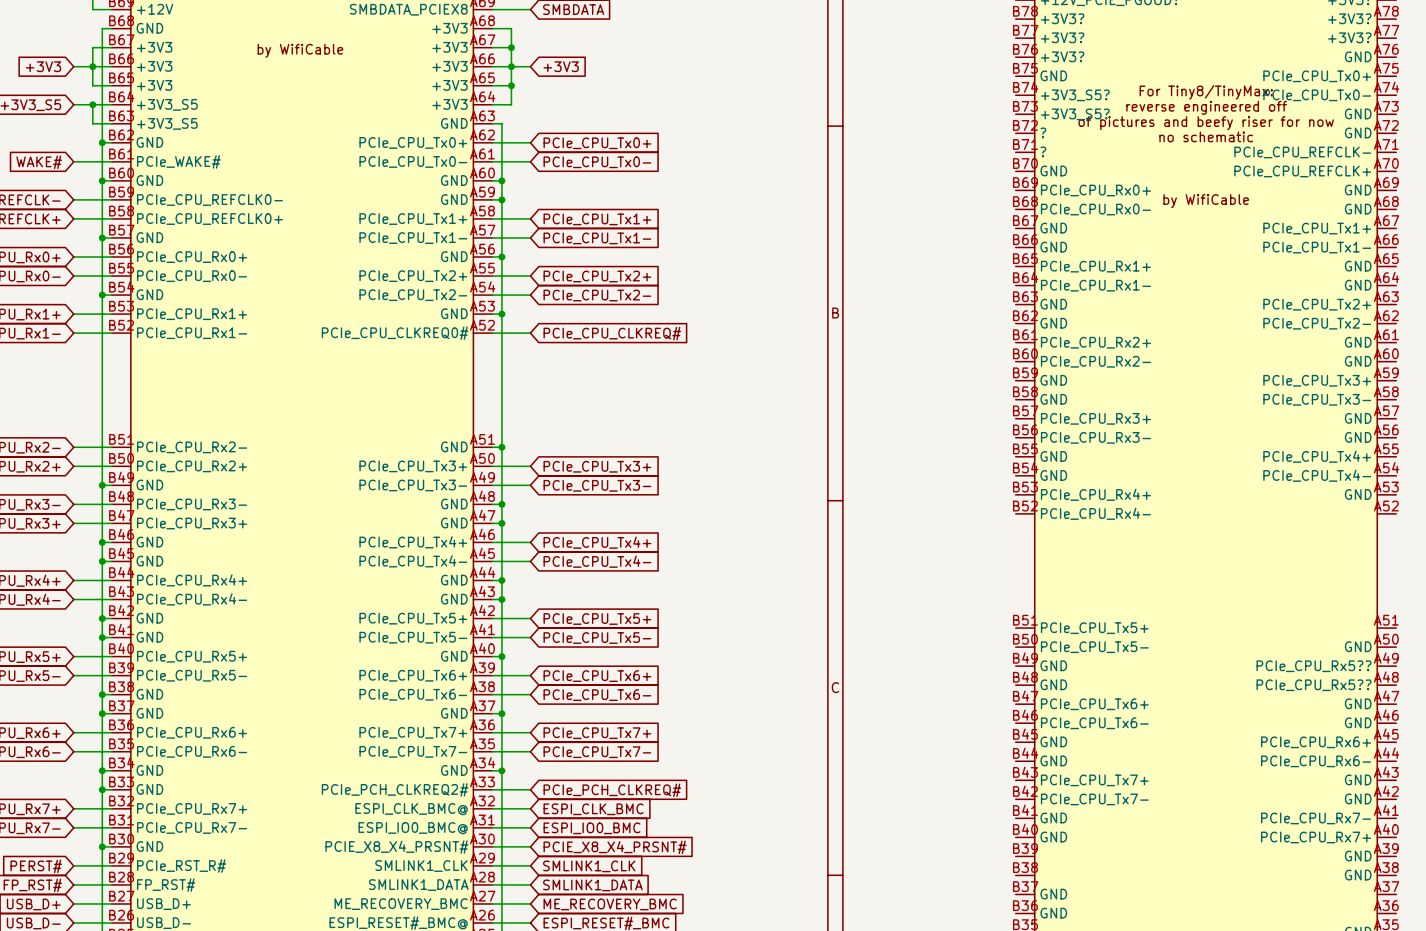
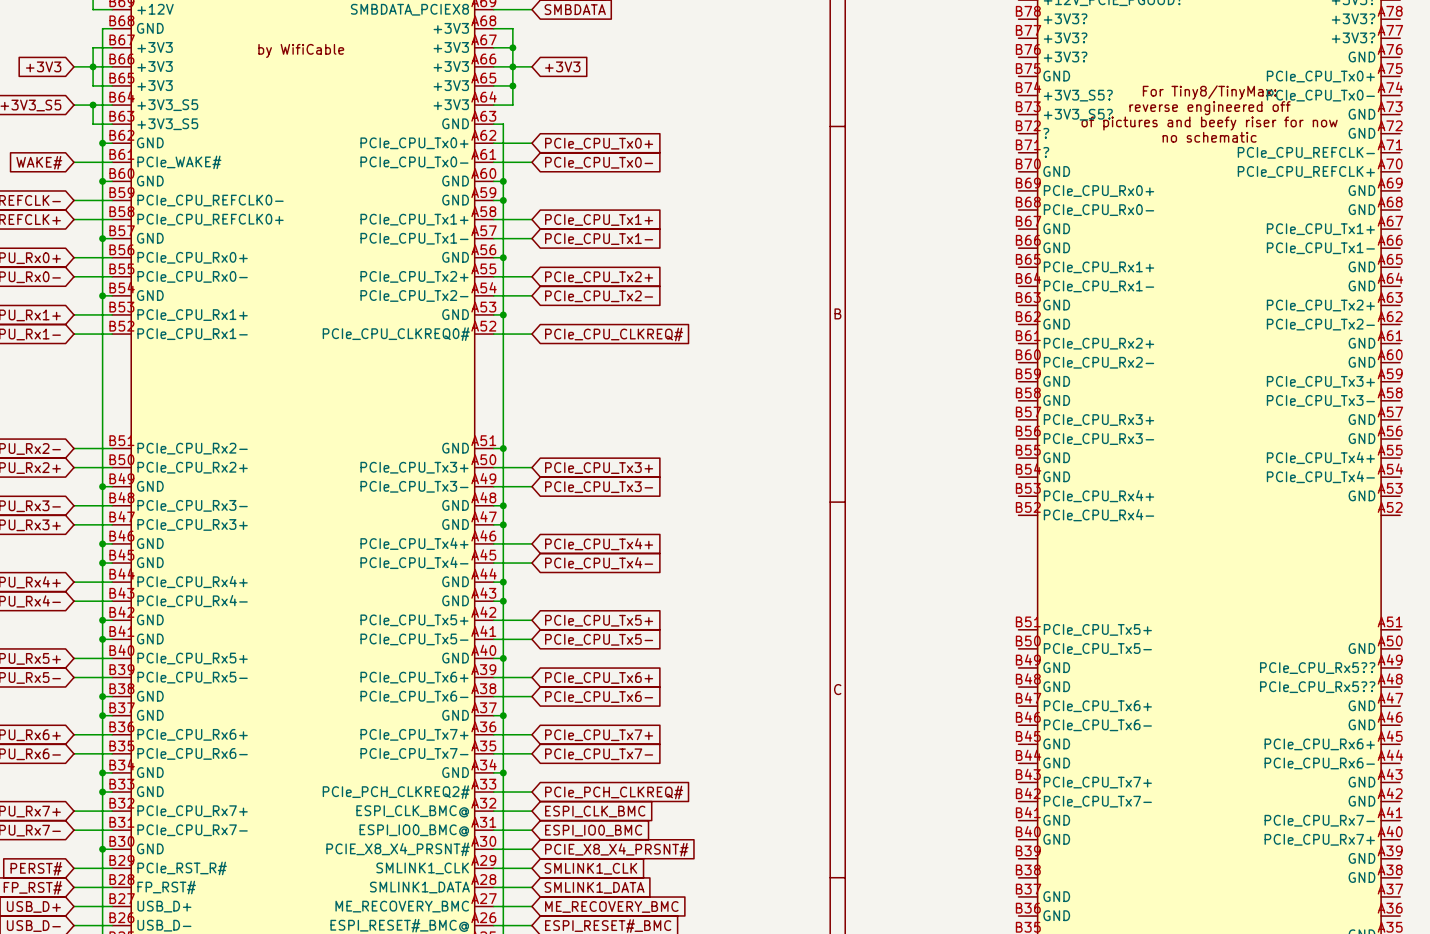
part text: by WifiCable (1206, 201) -> none

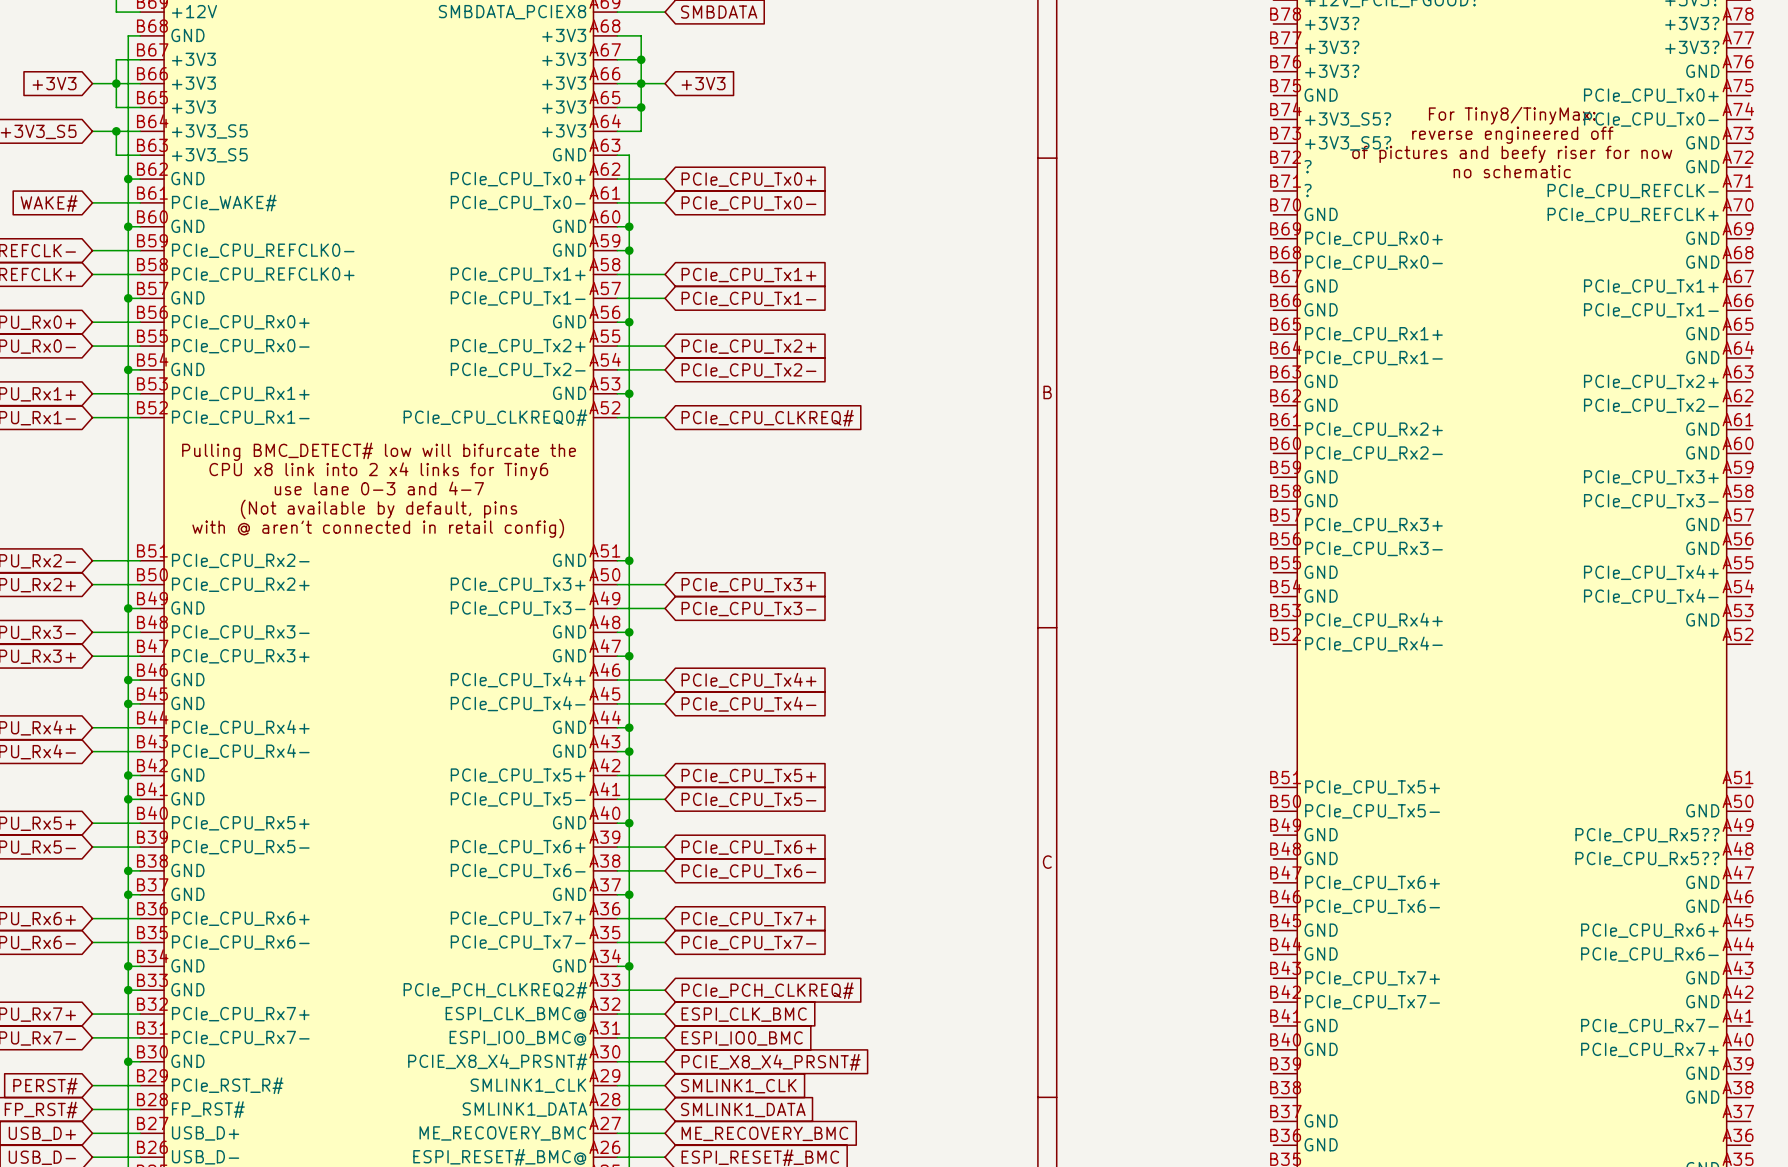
part text: by WifiCable (301, 50) -> none
part text: none -> Pulling BMC_DETECT# low will bifurcate the (379, 451)
part text: none -> CPU x8 link into 2 x4 links for Tiny6 (378, 471)
part text: none -> use lane 0-3 and 4-7 (379, 488)
part text: none -> (Not available by default, pins (379, 509)
part text: none -> with @ aren't connected in retail config) (378, 528)

